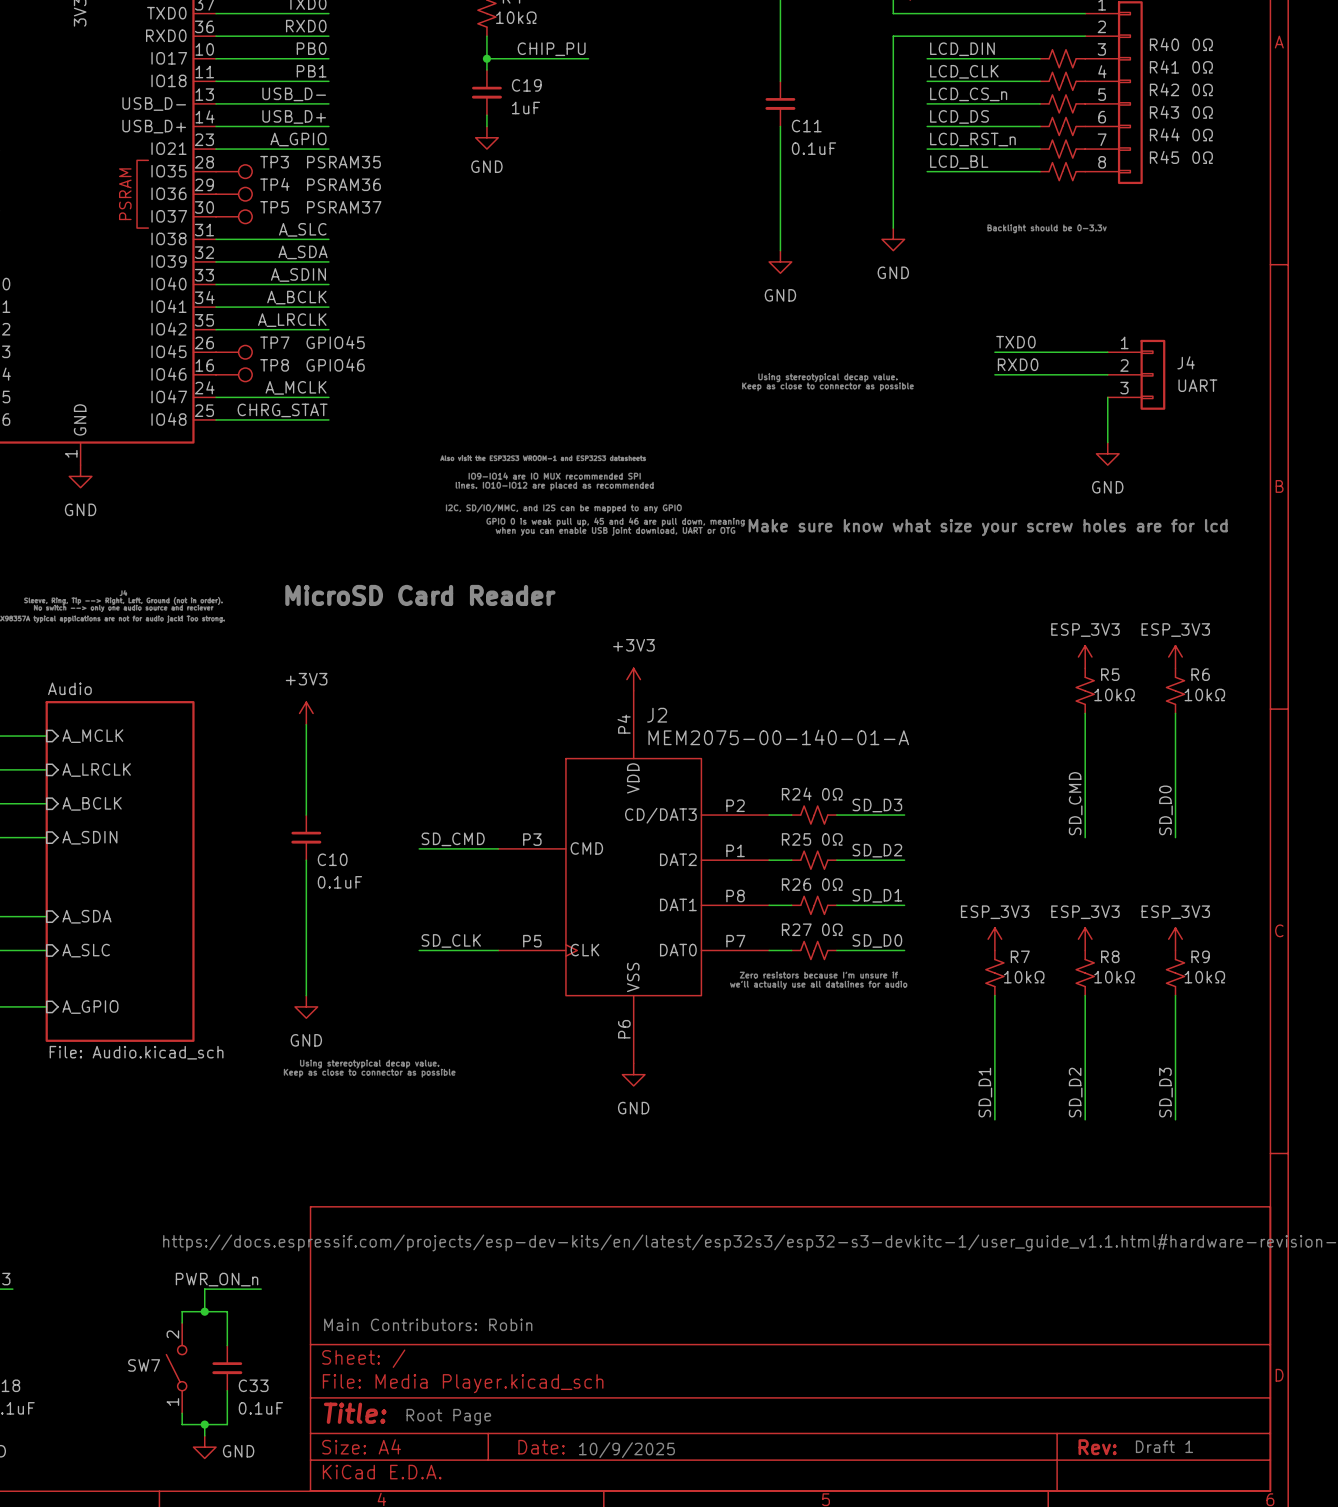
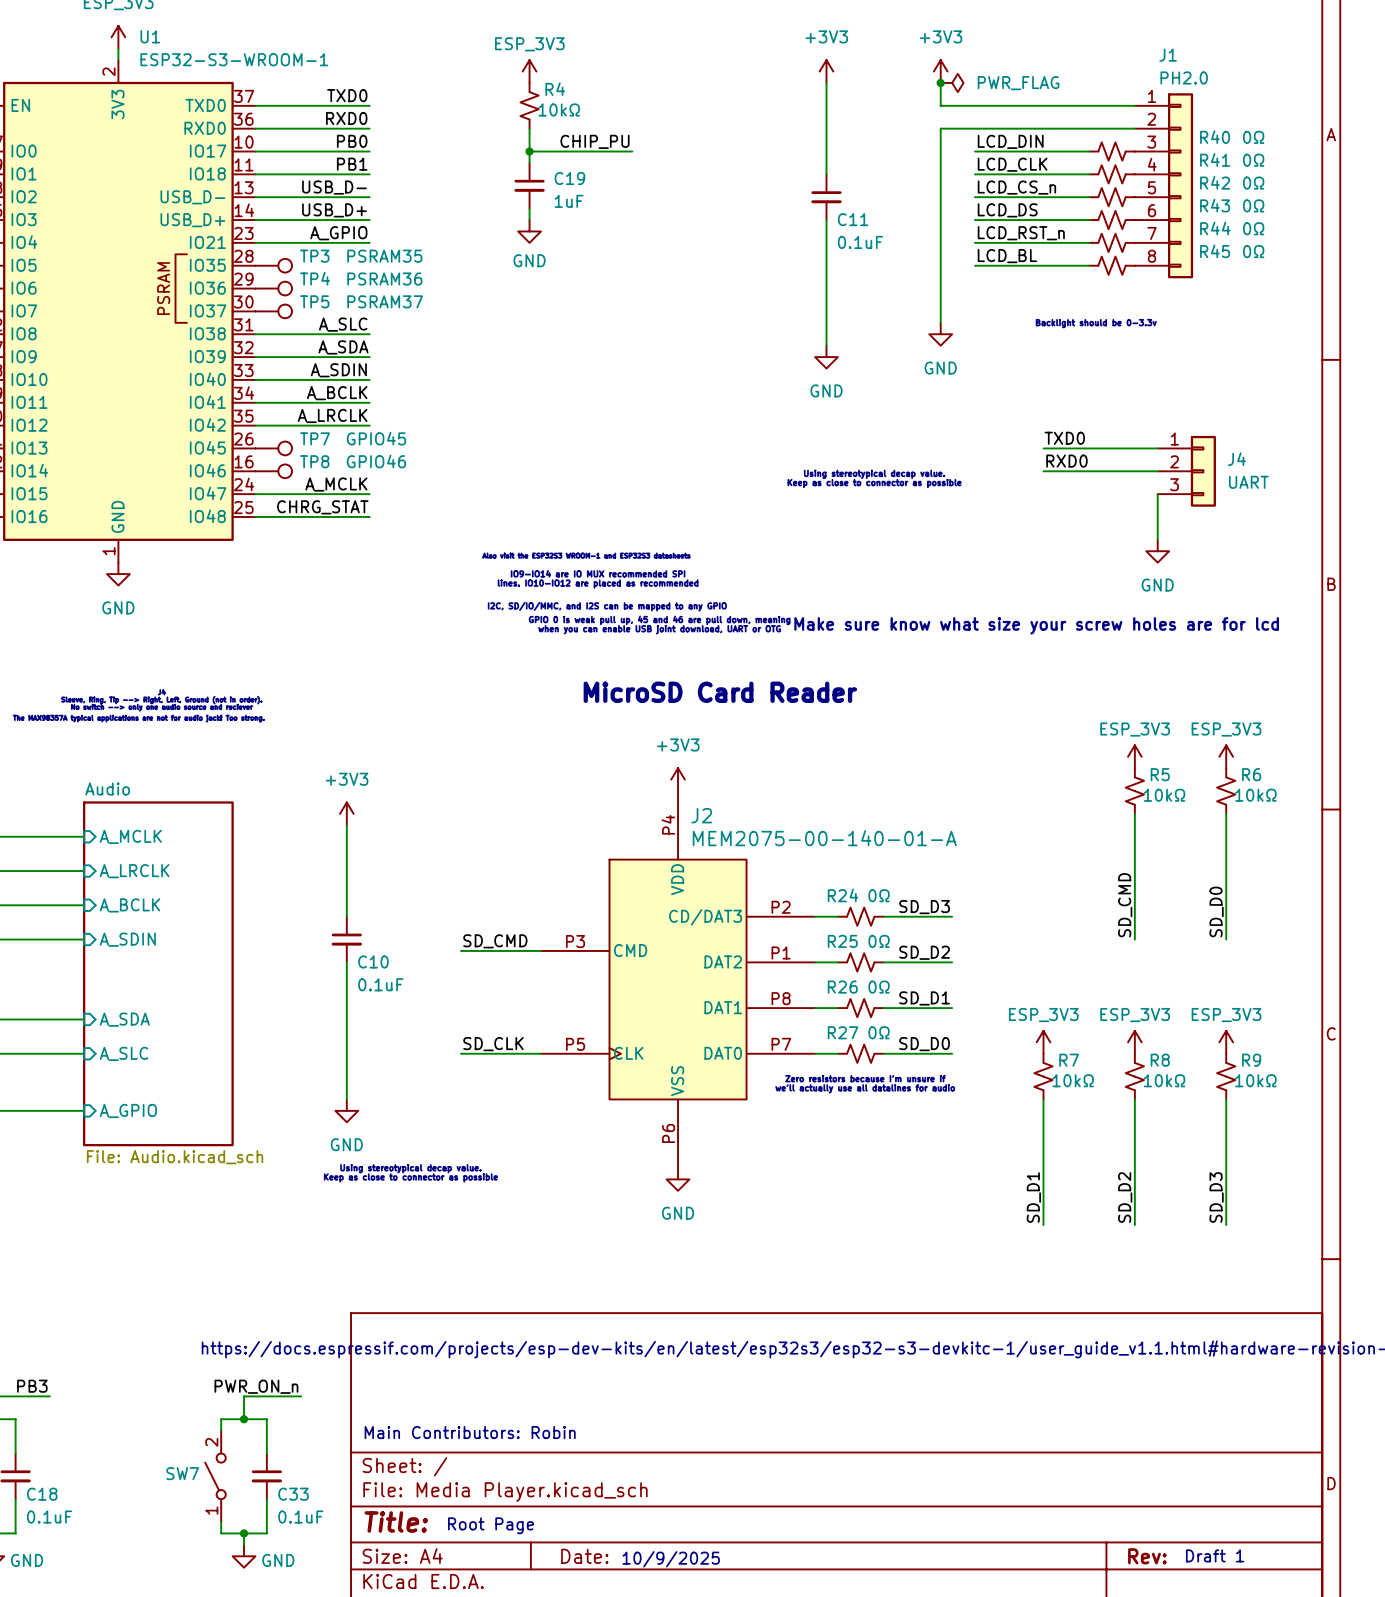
text: none -> MicroSD Card Reader (720, 692)
text: MicroSD Card Reader (420, 595) -> none

